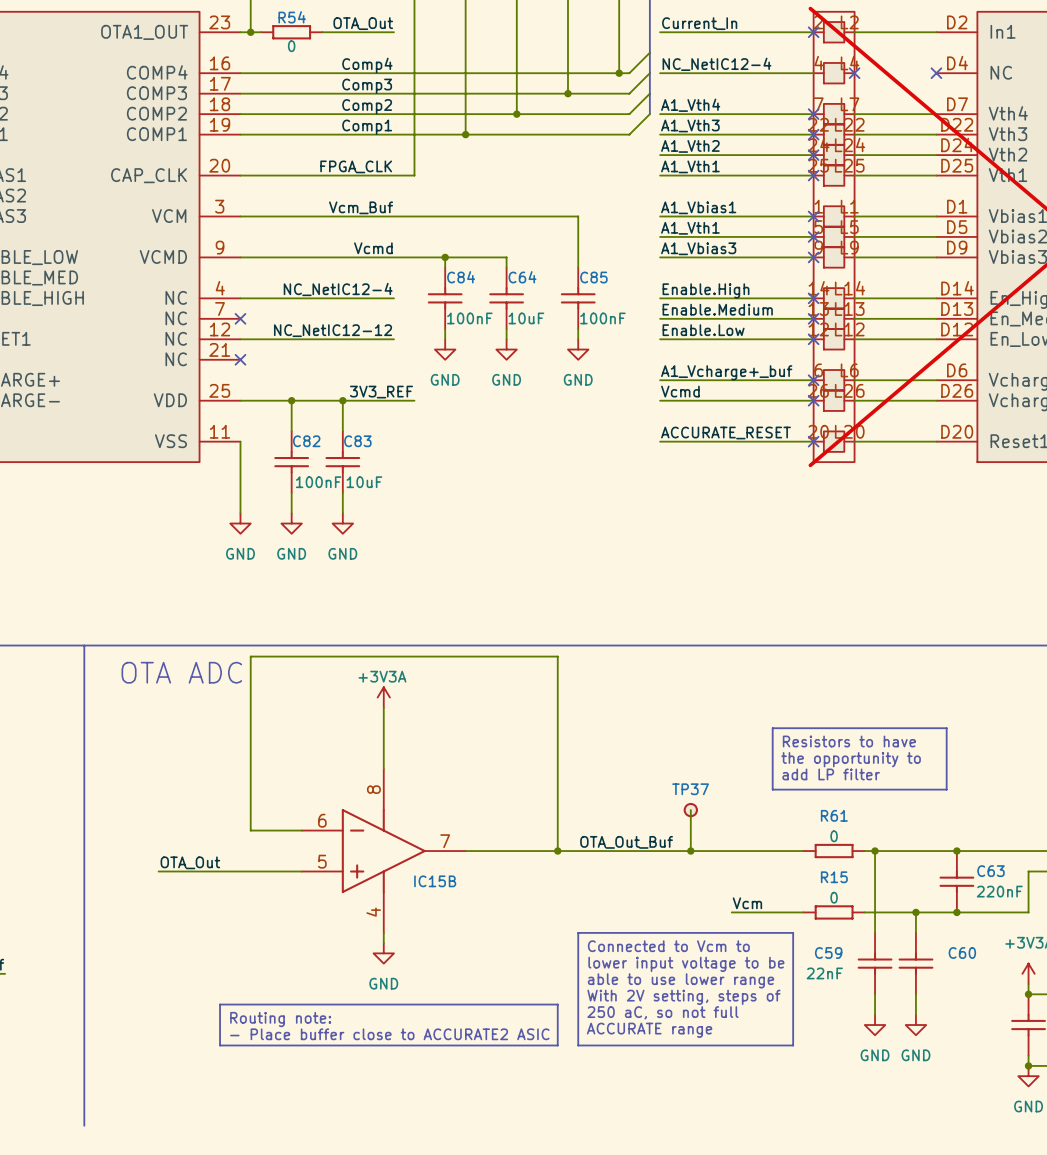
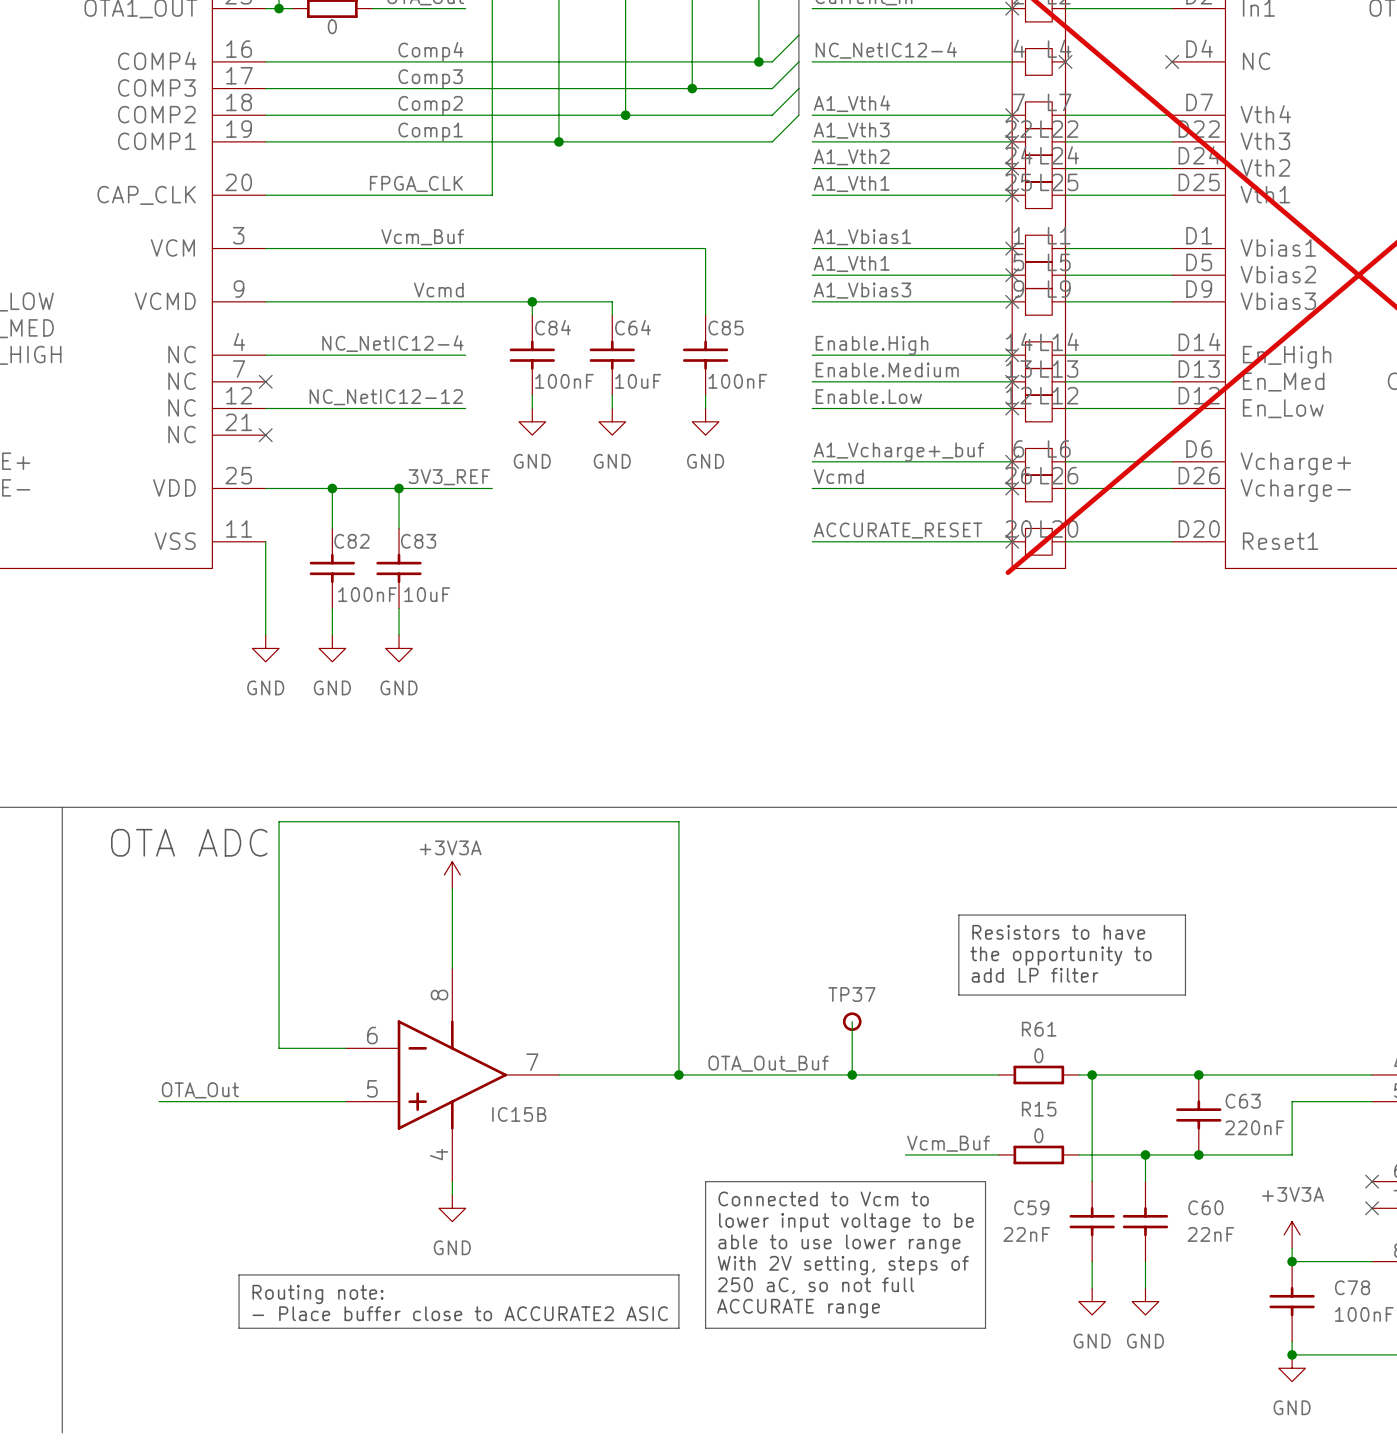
label: Vcm (747, 903) -> Vcm_Buf (948, 1143)
C60 text: none -> 22nF (1210, 1234)

